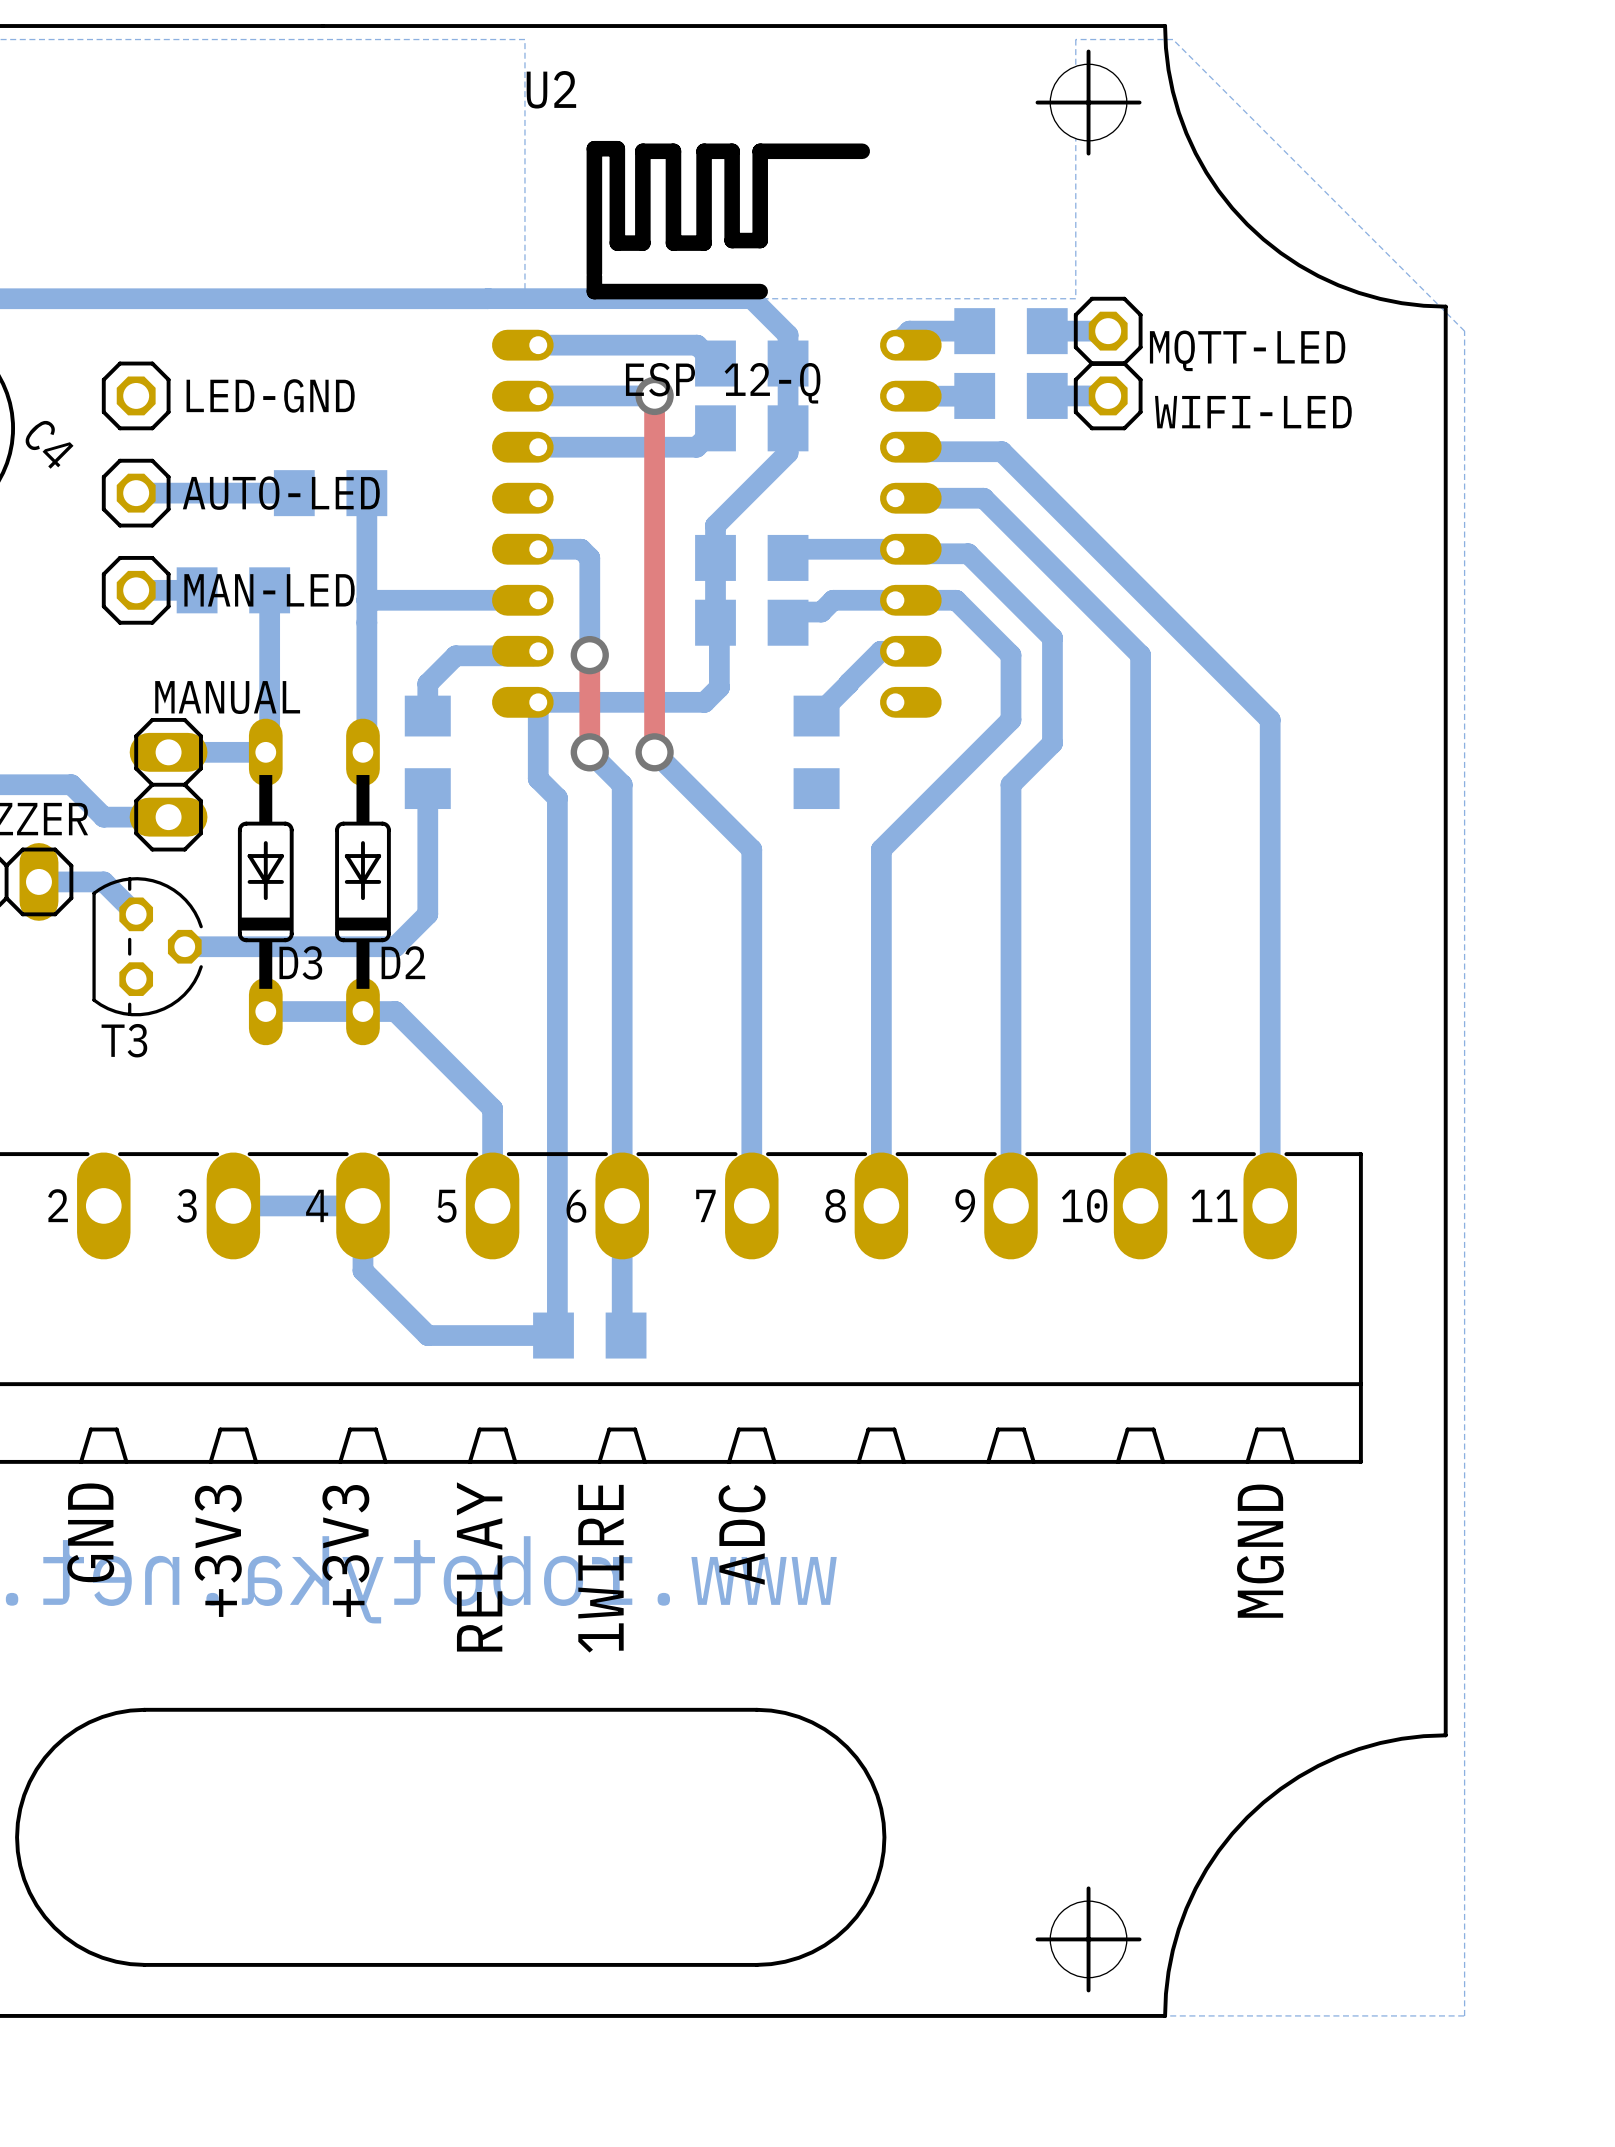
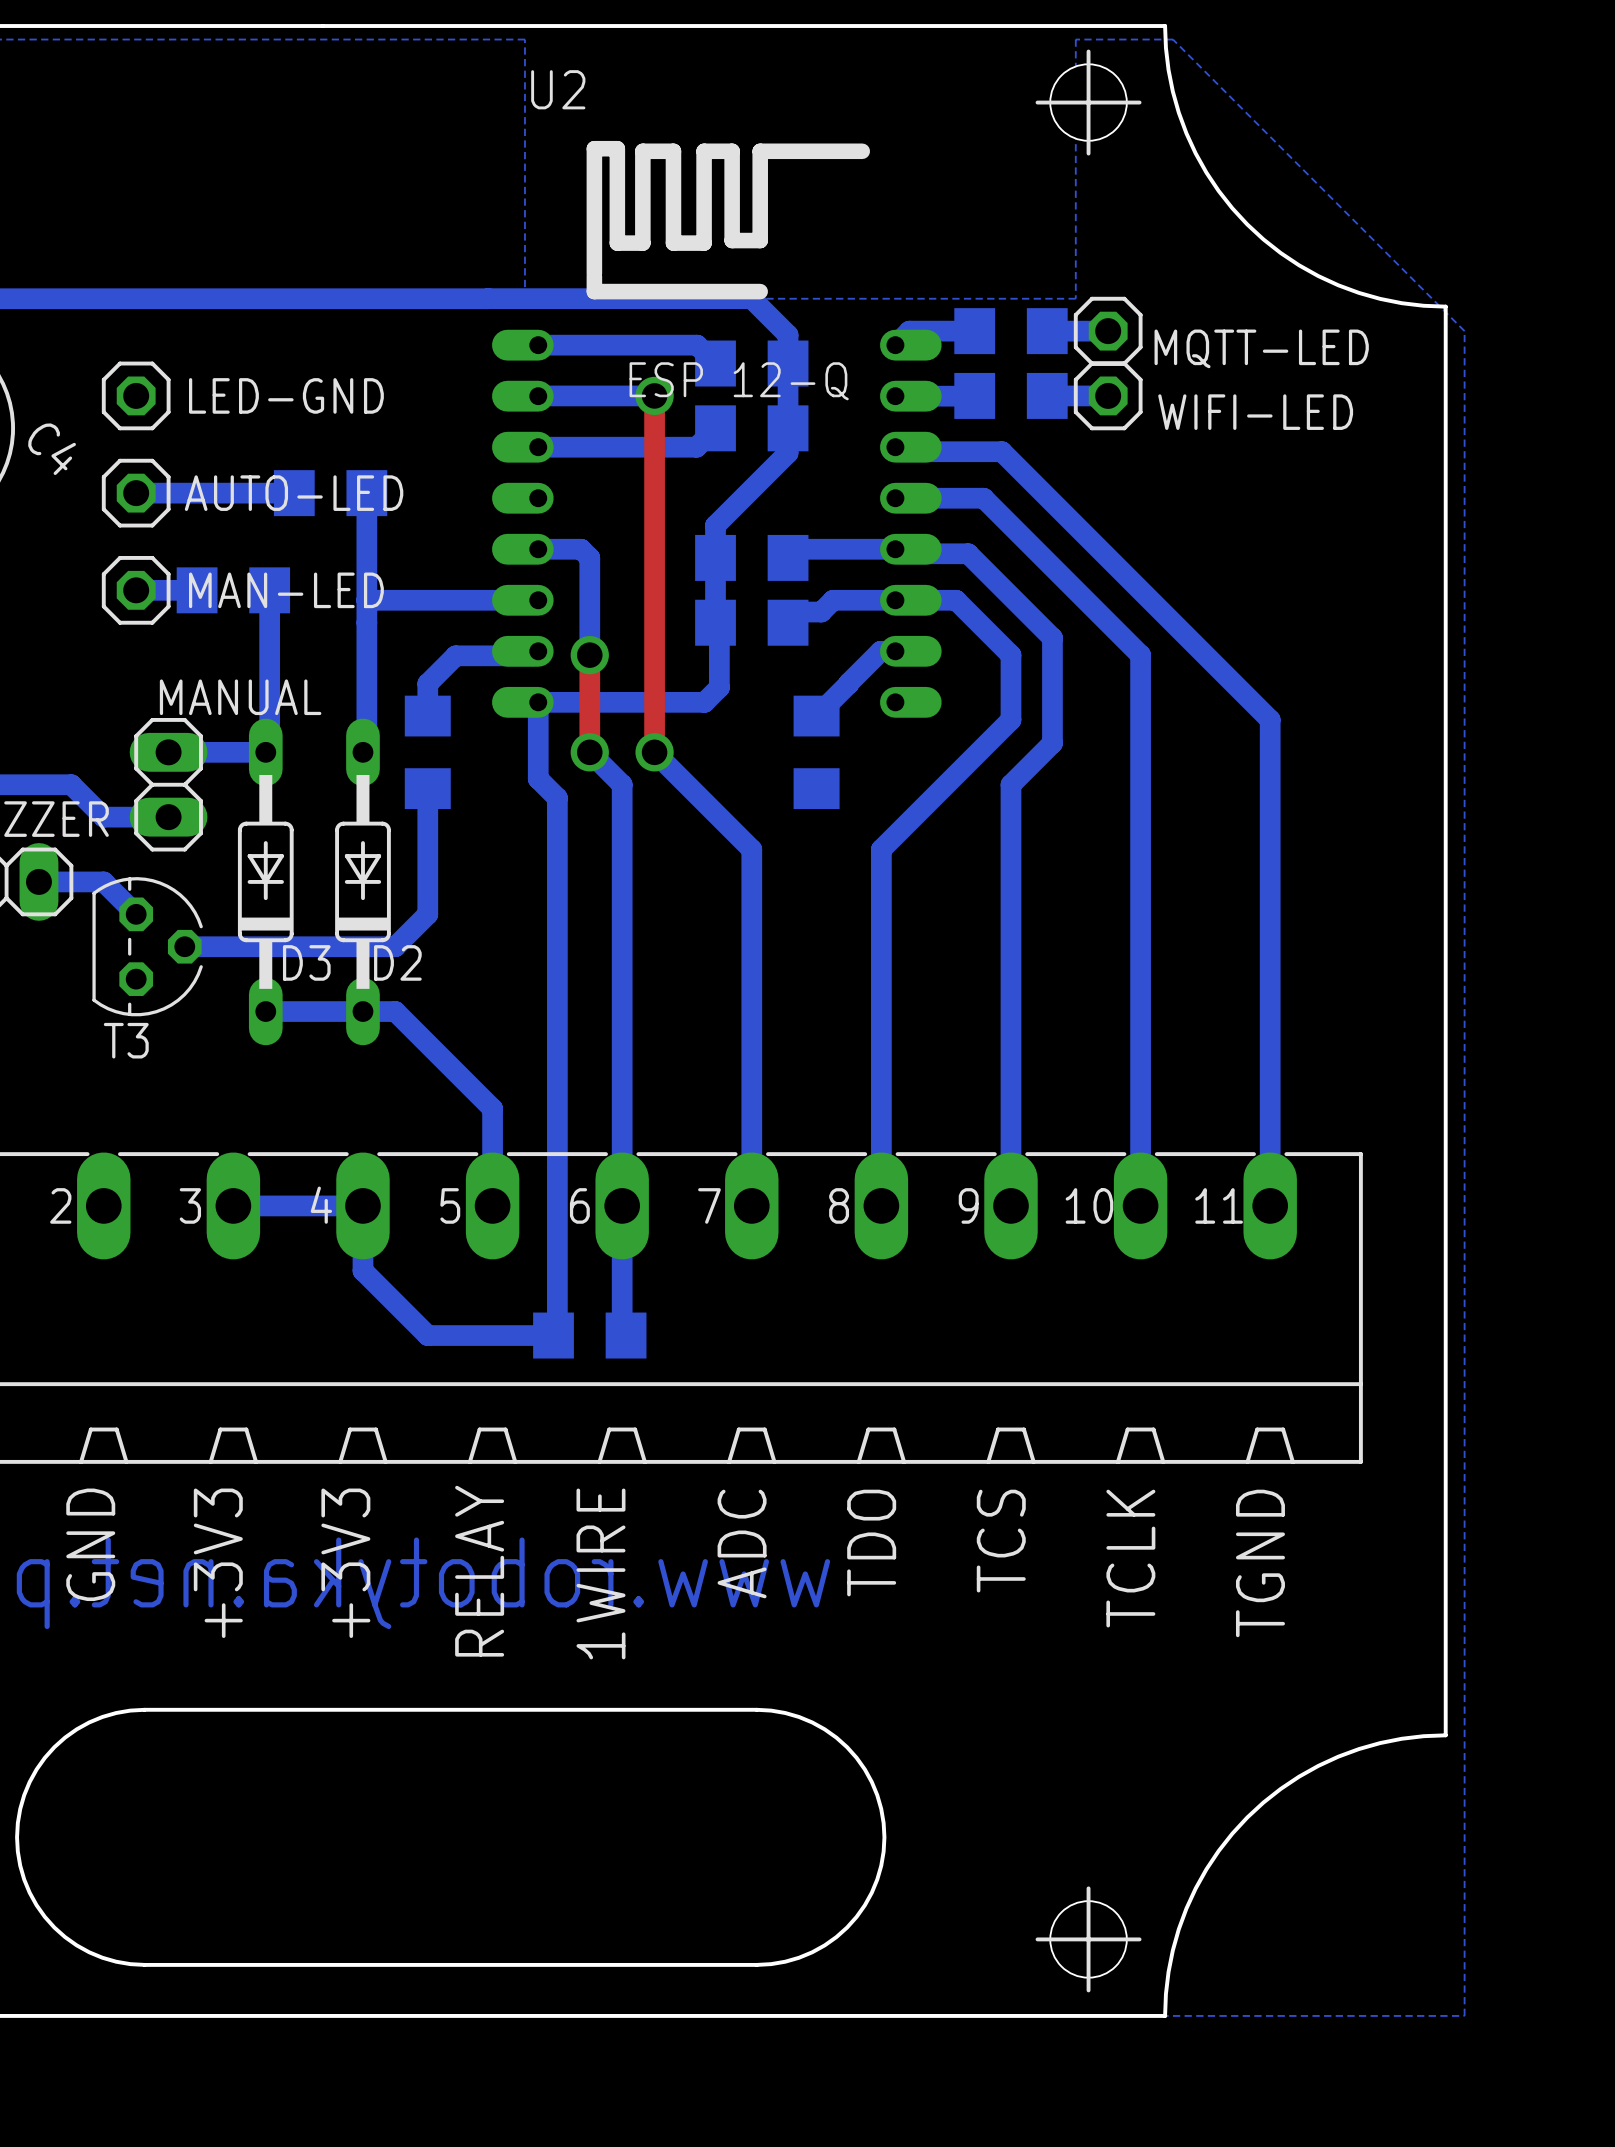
text: none -> TDO (871, 1543)
text: none -> TCS (1001, 1541)
text: none -> TCLK (1130, 1558)
text: MGND (1260, 1551) -> TGND (1260, 1563)

